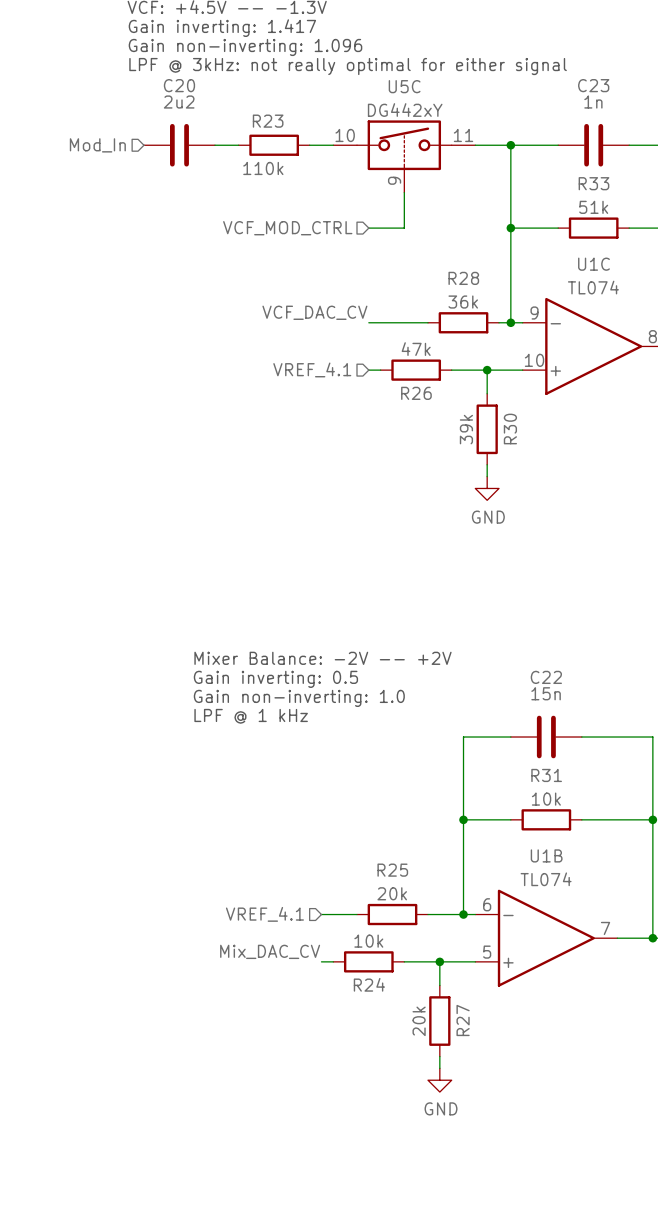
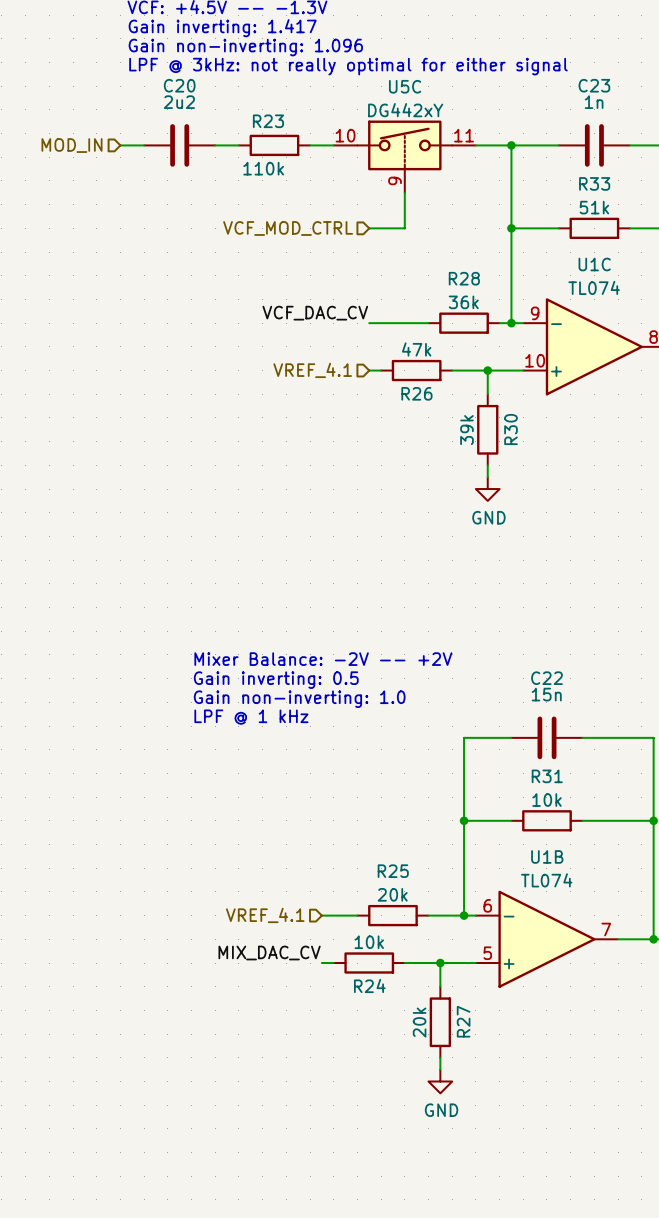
hierarchical label: none -> MOD_IN (72, 145)
hierarchical label: Mod_In (97, 145) -> none
wire: none -> (120, 145) (144, 145)
label: Mix_DAC_CV (270, 951) -> MIX_DAC_CV (269, 952)

